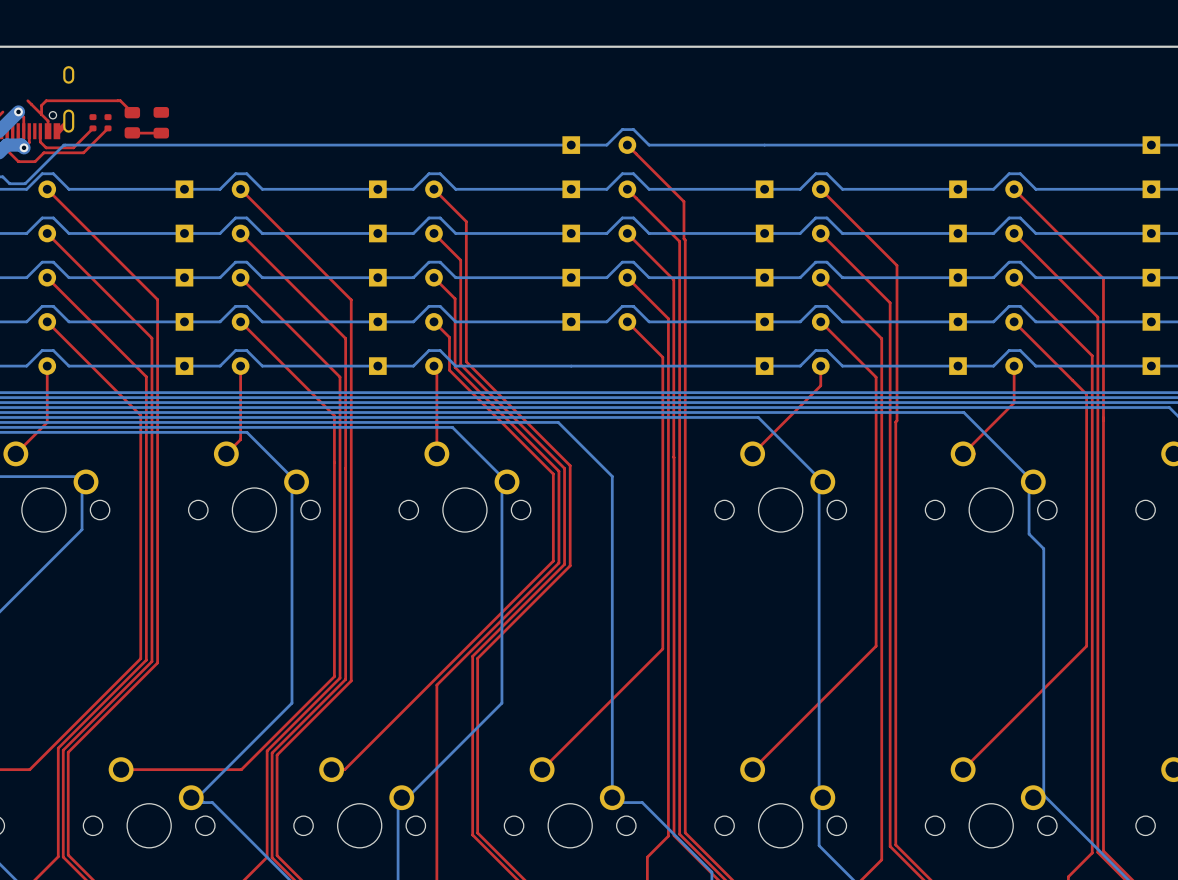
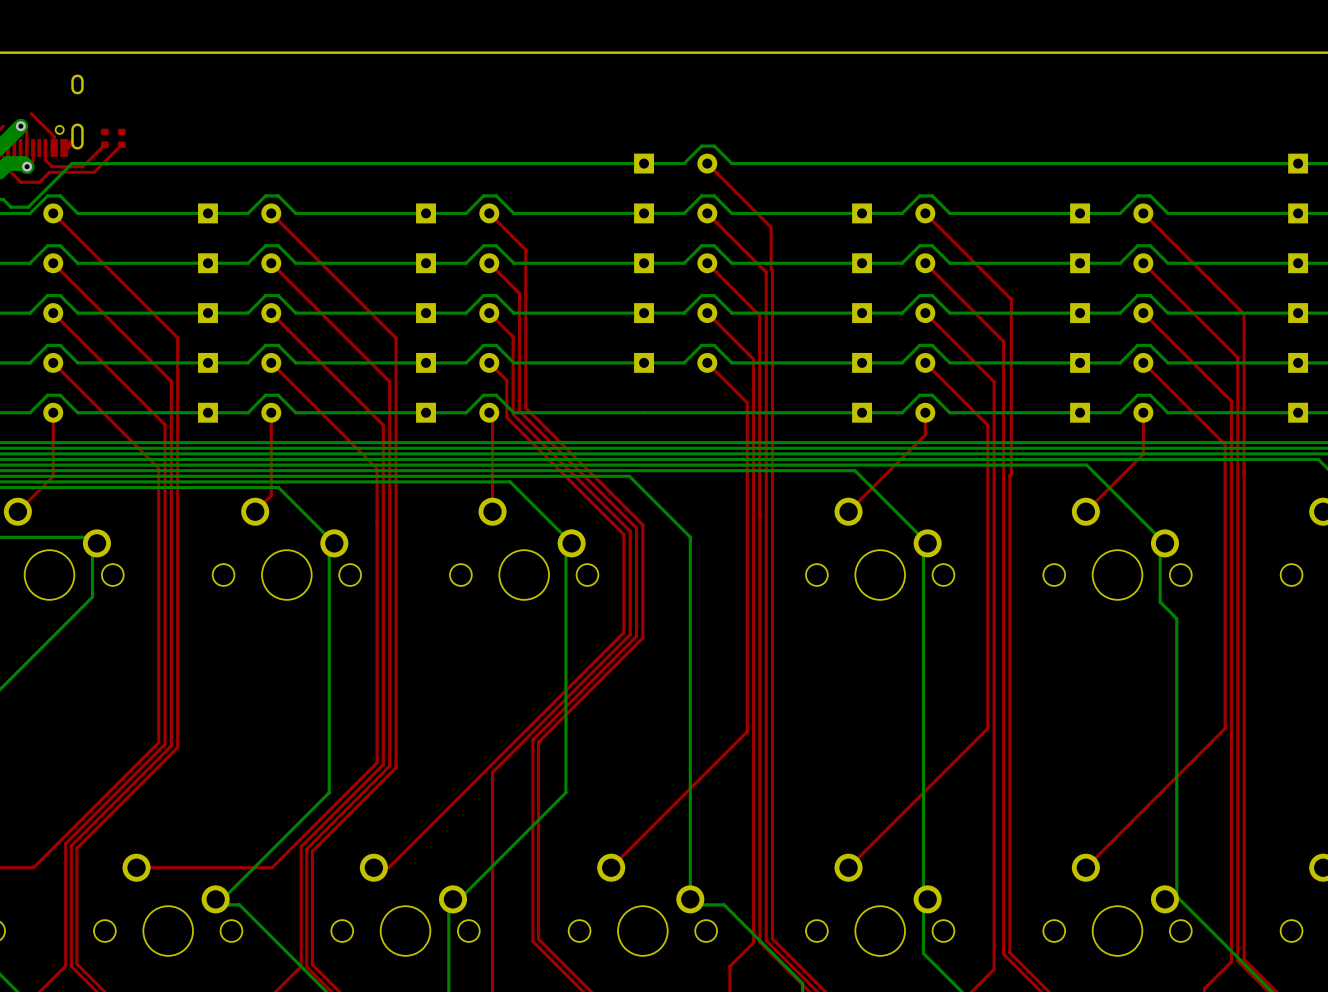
top track: (132, 112) (120, 100) (46, 100) (41, 105) (41, 114) -> none
part: (132, 122) -> none
part: (161, 122) -> none
top track: (161, 133) (132, 133) -> none

